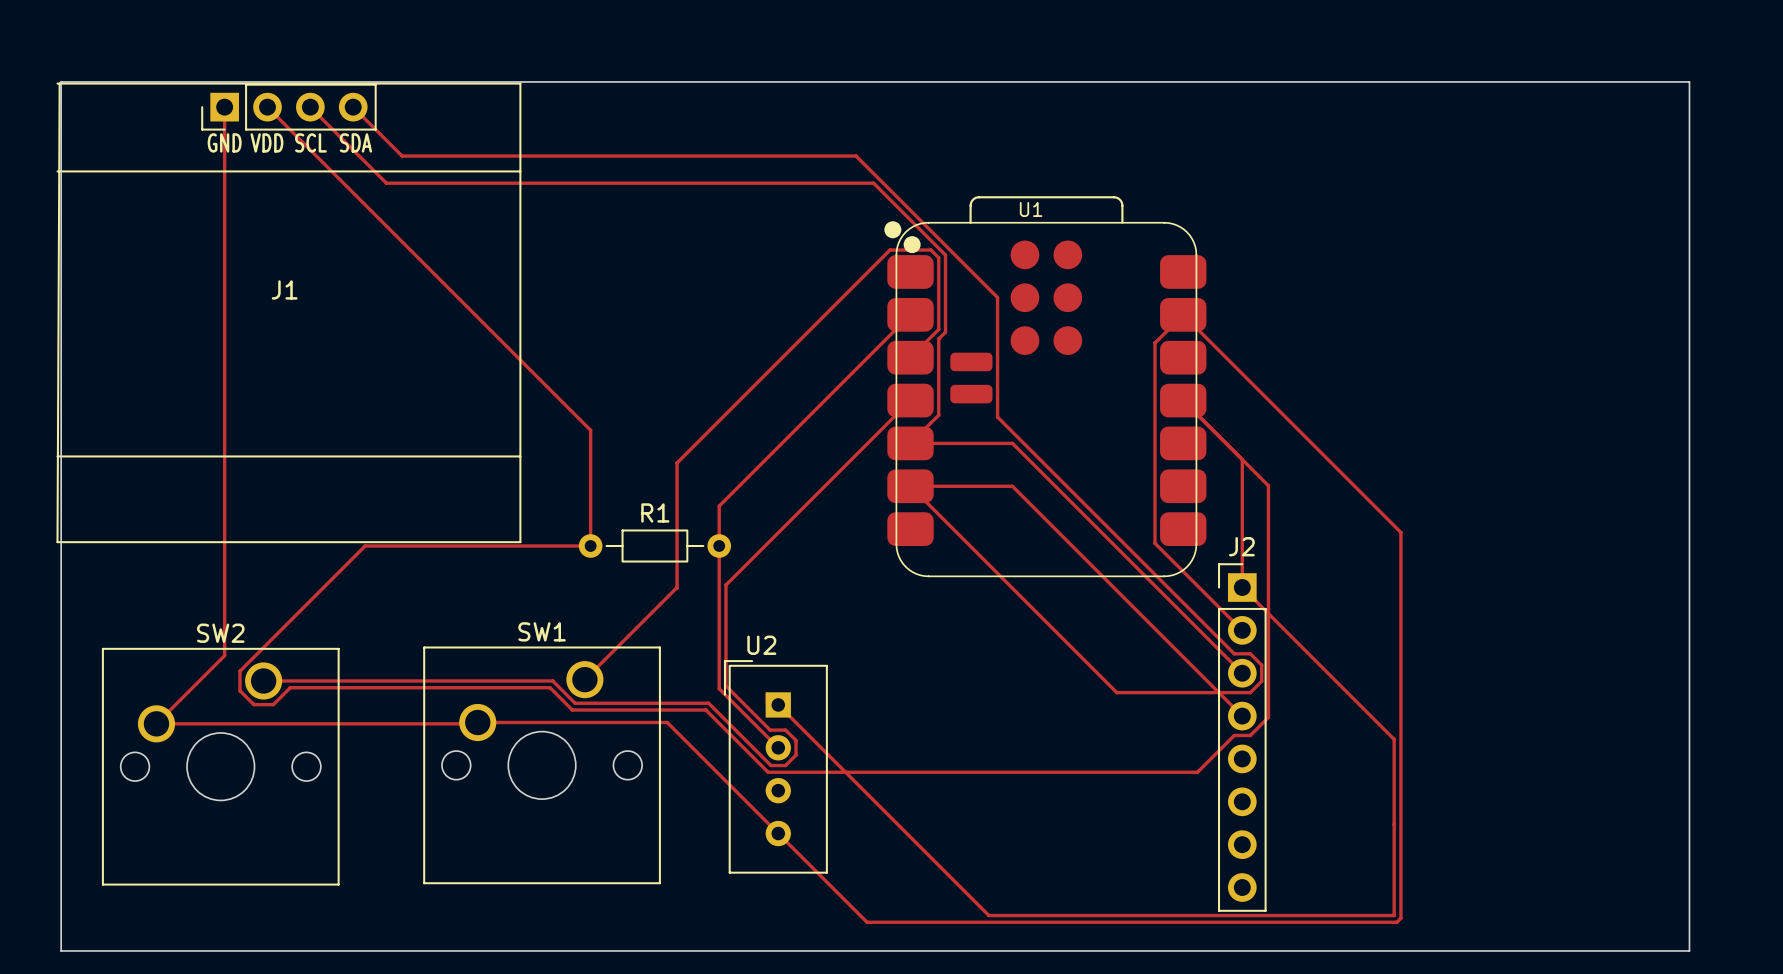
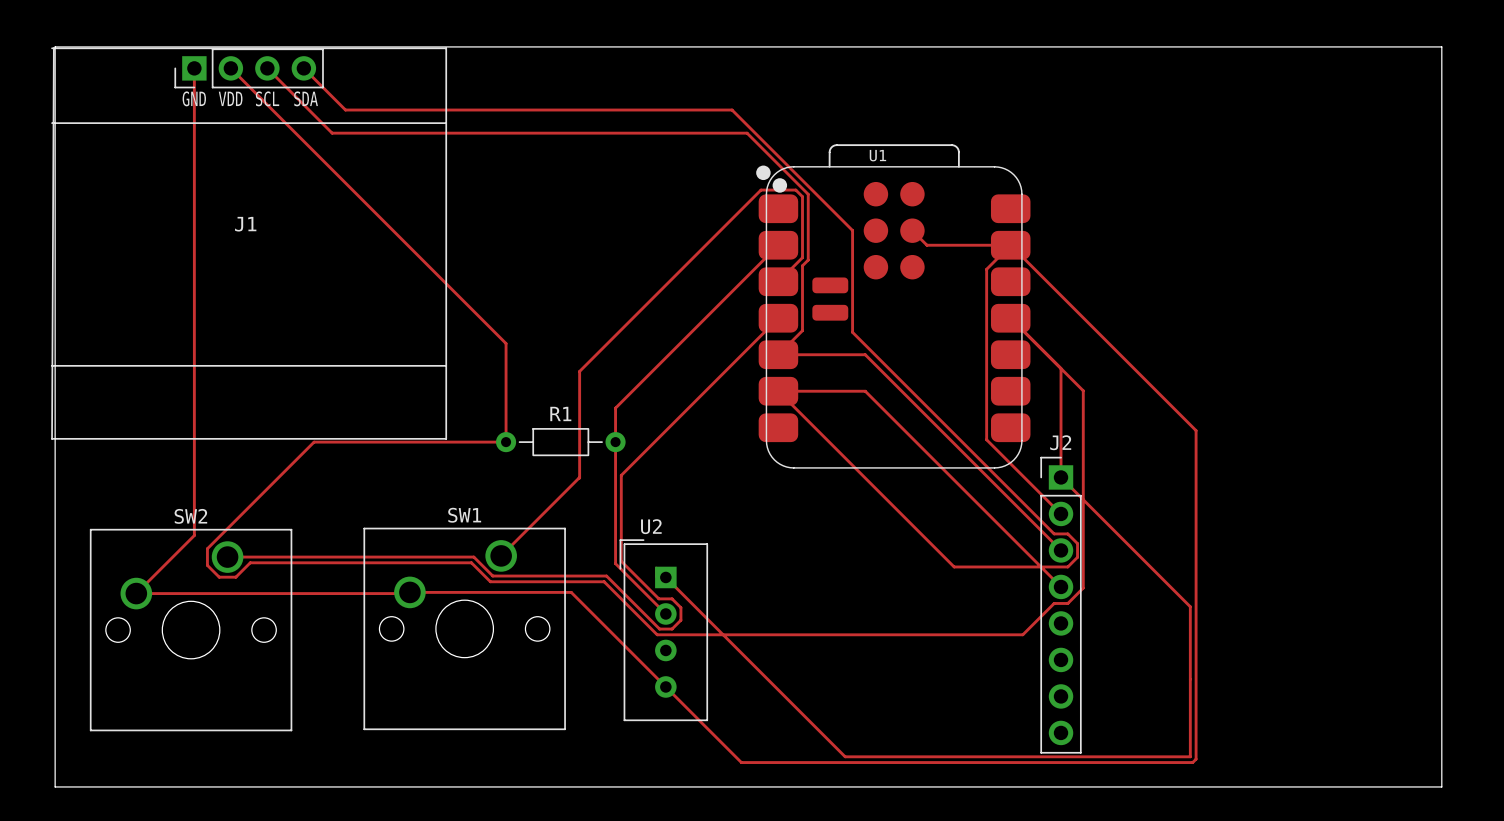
top track: none -> (912, 230) (926, 245) (1010, 245)

